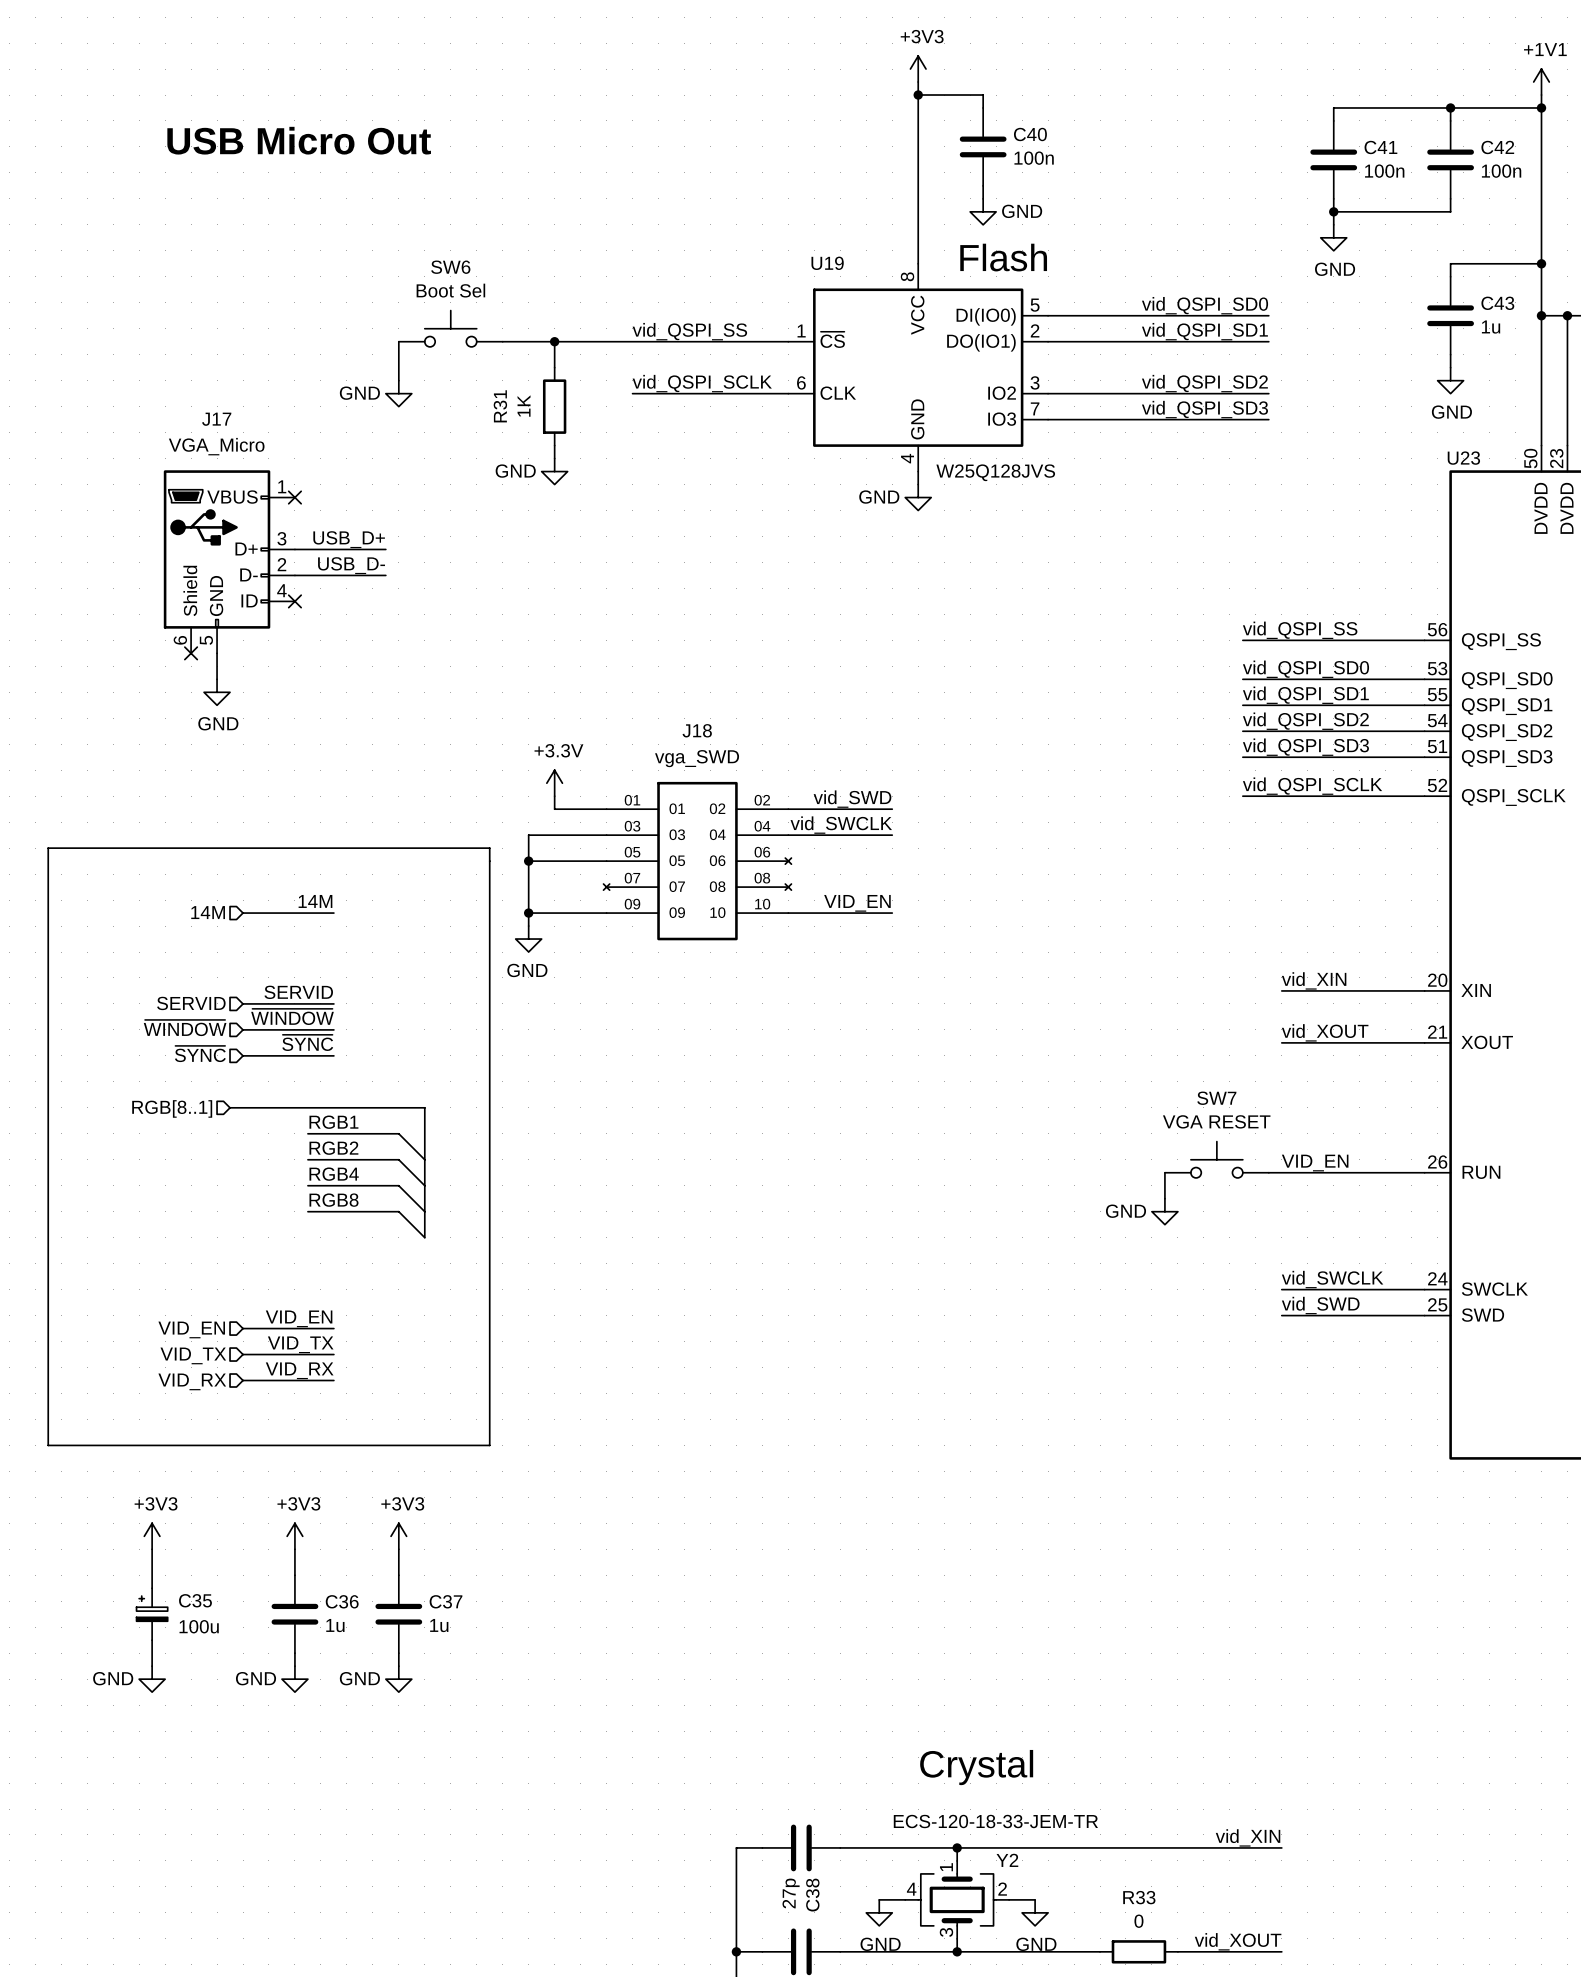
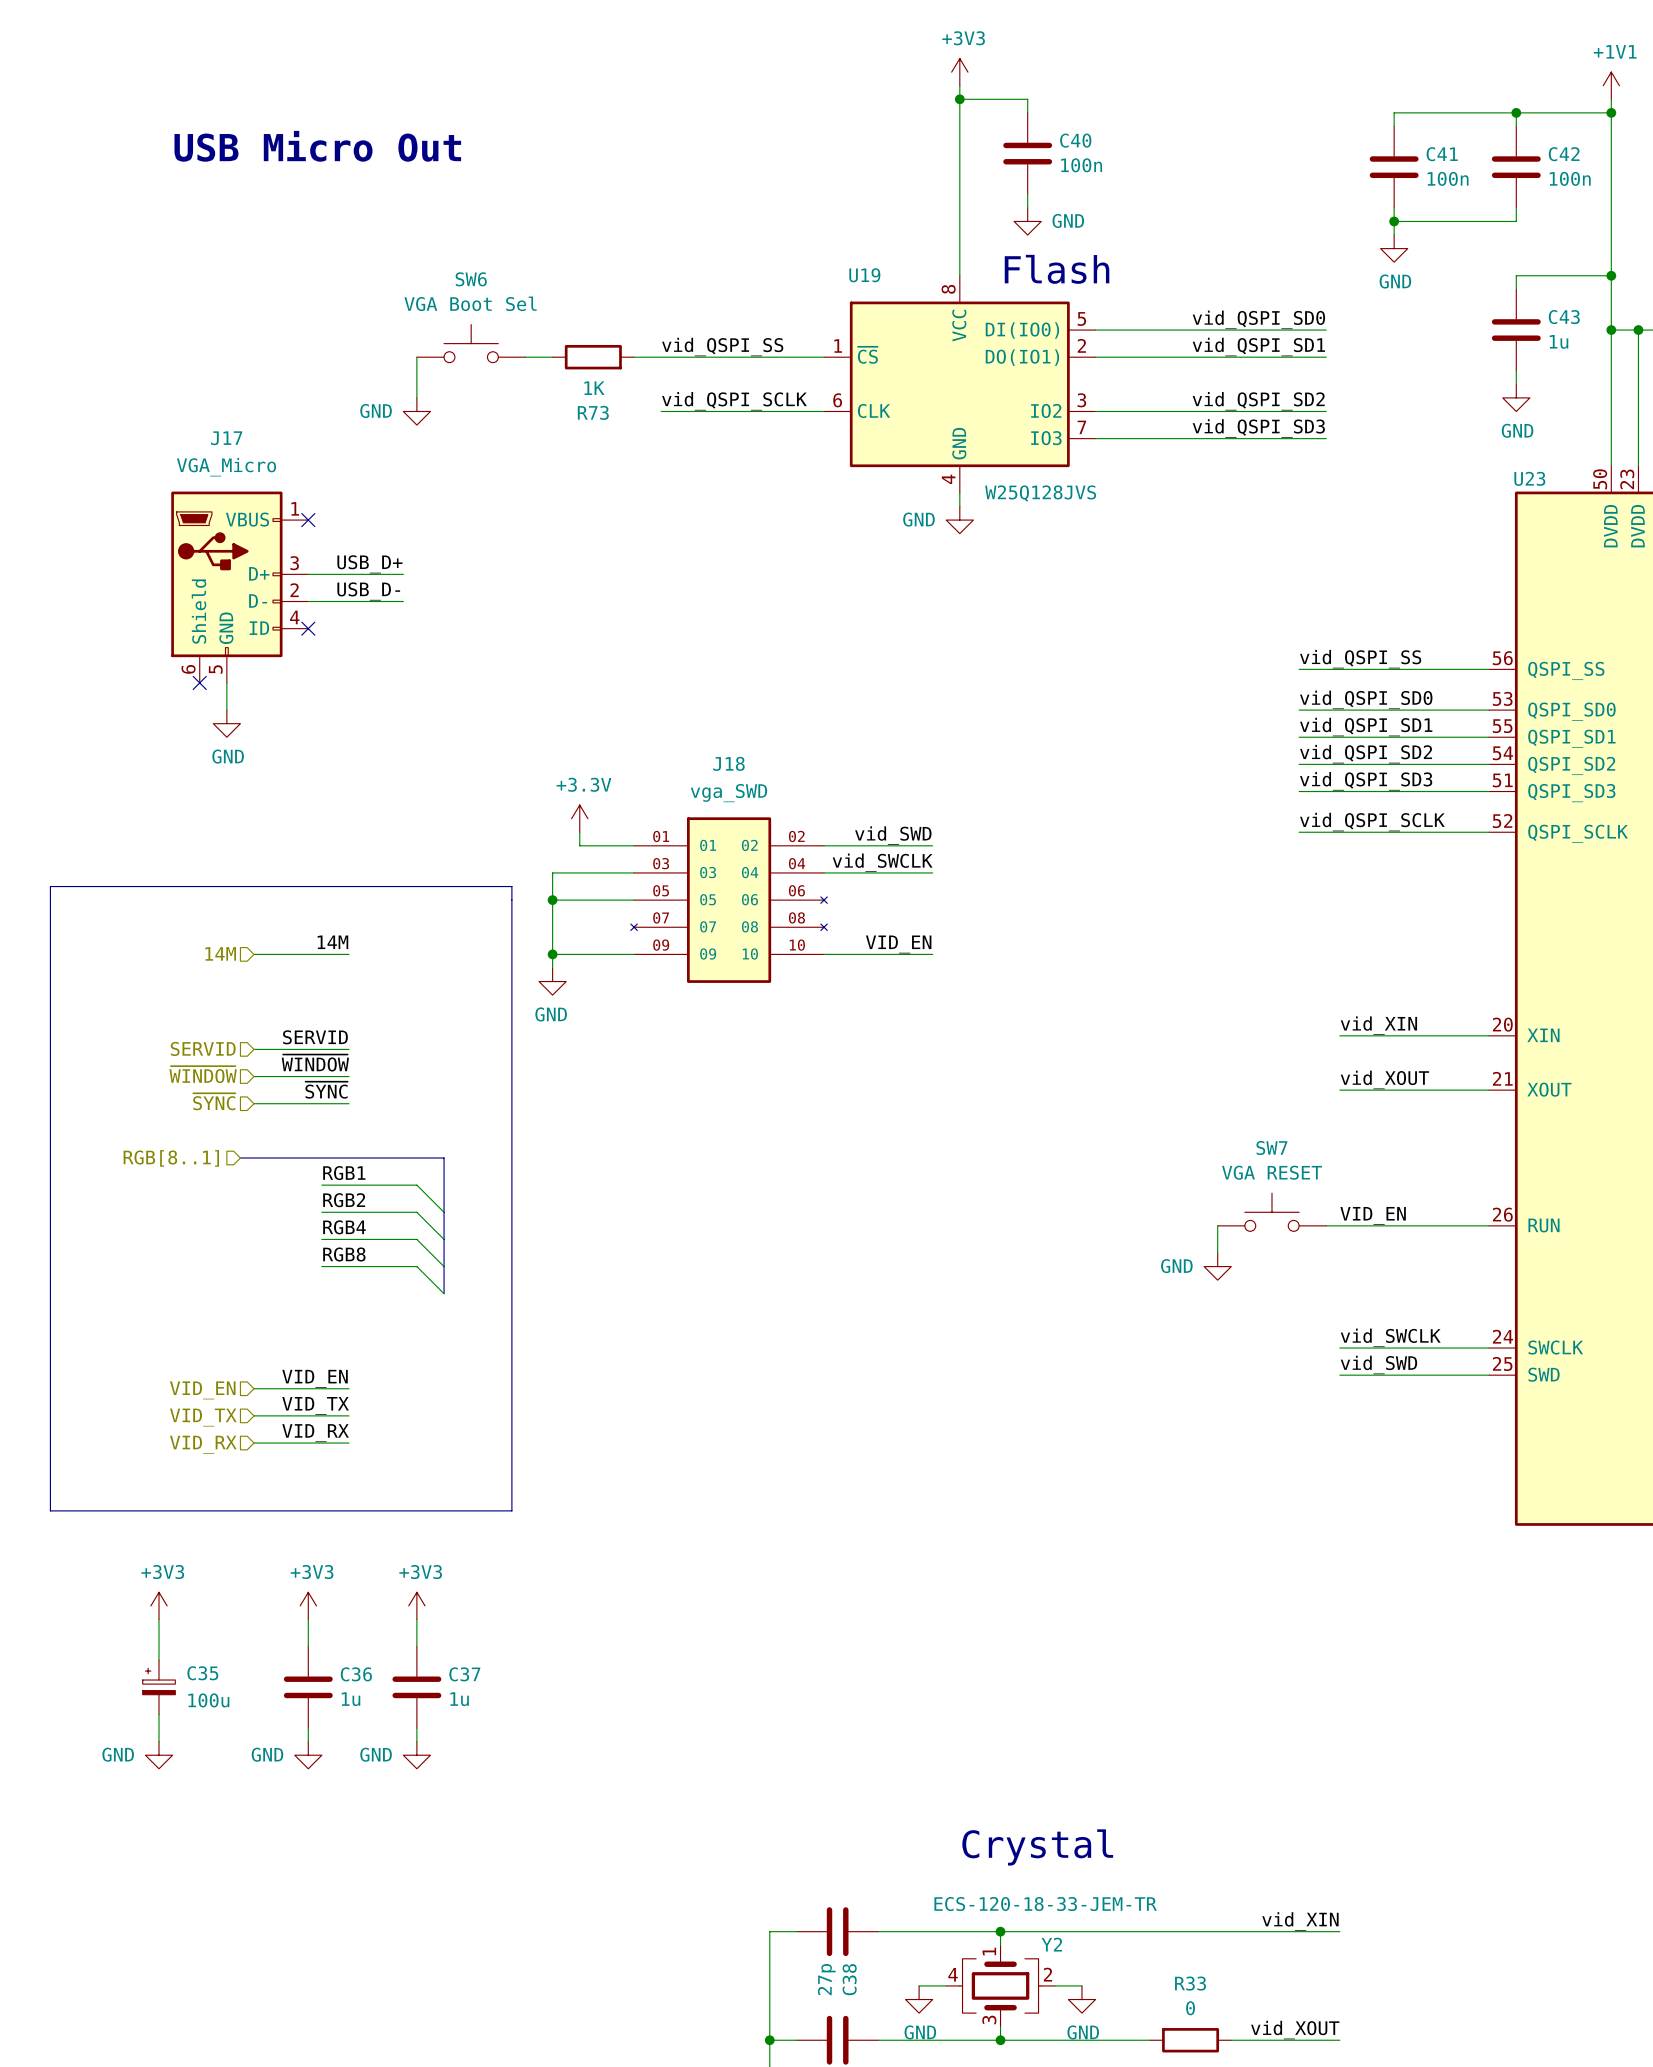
SW6 value: Boot Sel (450, 290) -> VGA Boot Sel (470, 303)
wire: (528, 341) (606, 341) -> none
wire: (554, 341) (554, 367) -> none
junction: (554, 341) -> none
R73: none -> 1K (593, 357)
R31: 1K (554, 406) -> none
wire: (554, 445) (554, 458) -> none
power symbol: GND (554, 471) -> none

